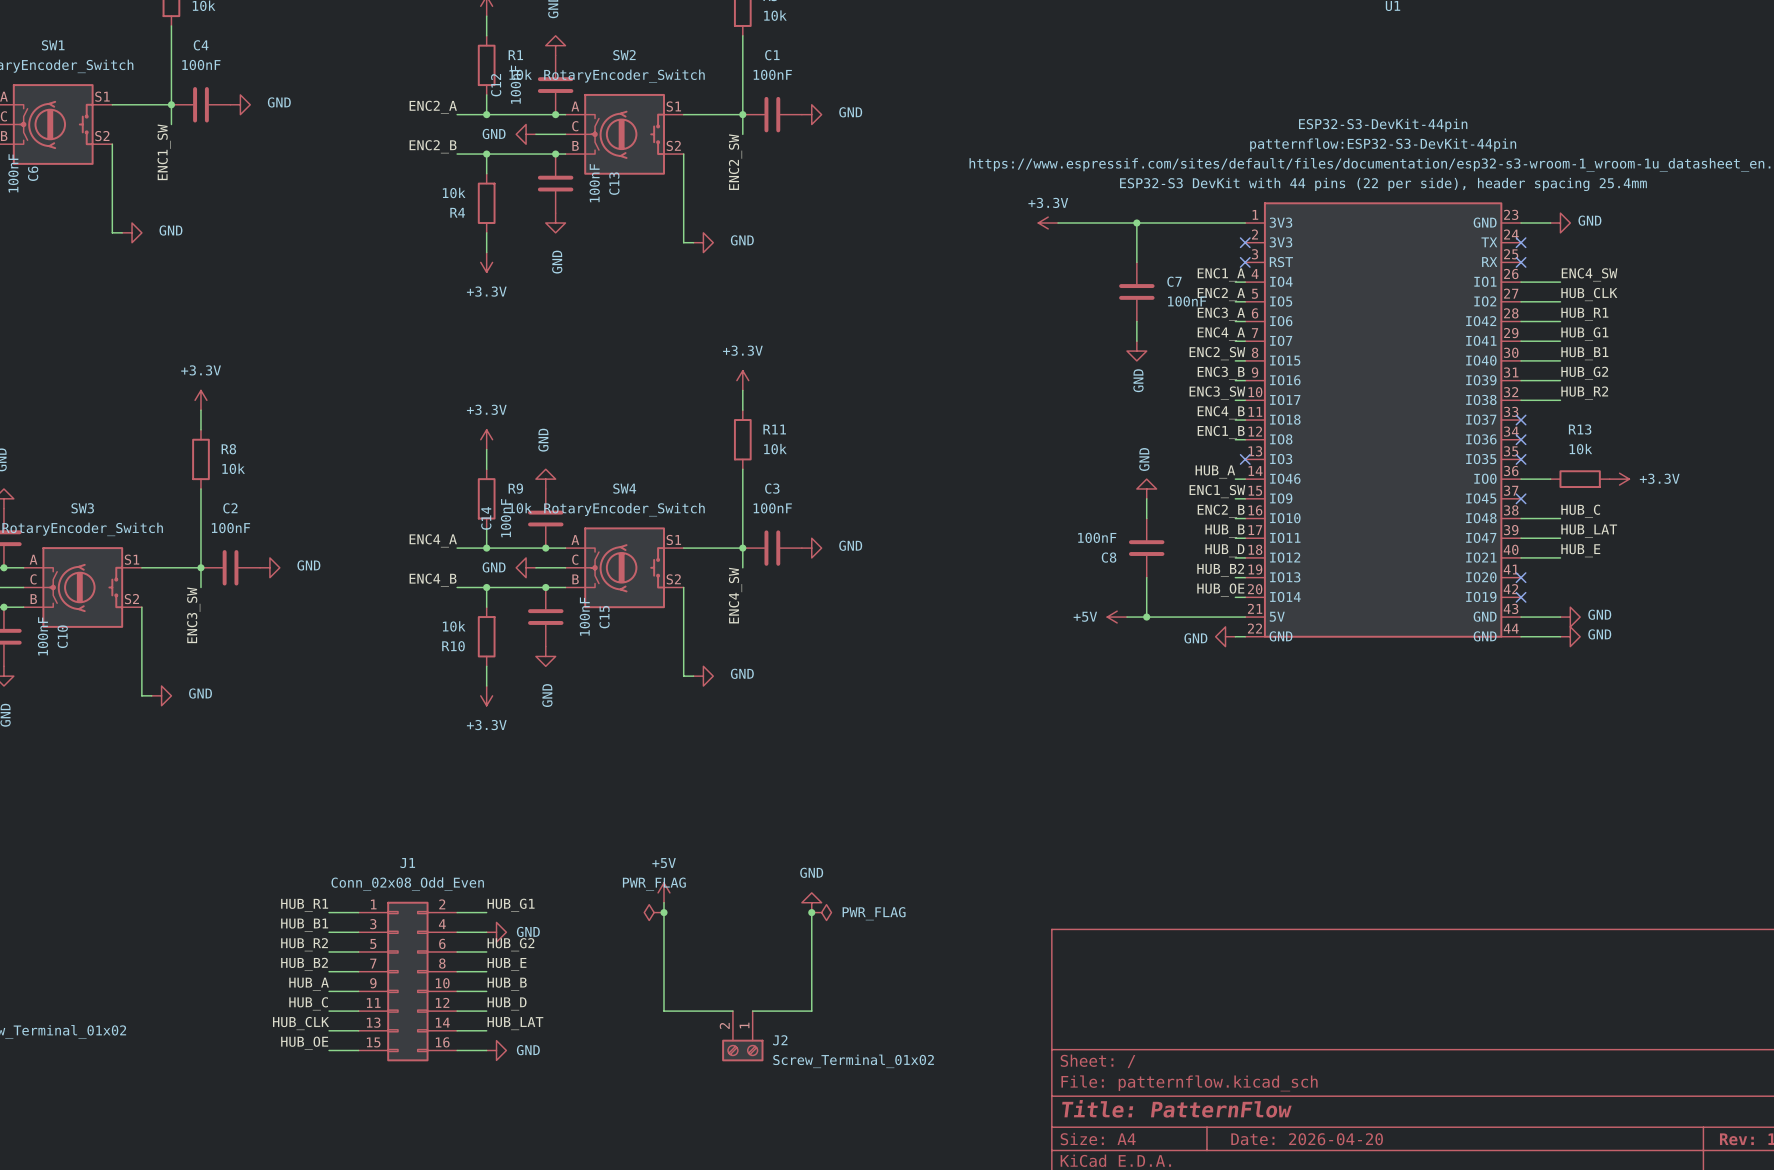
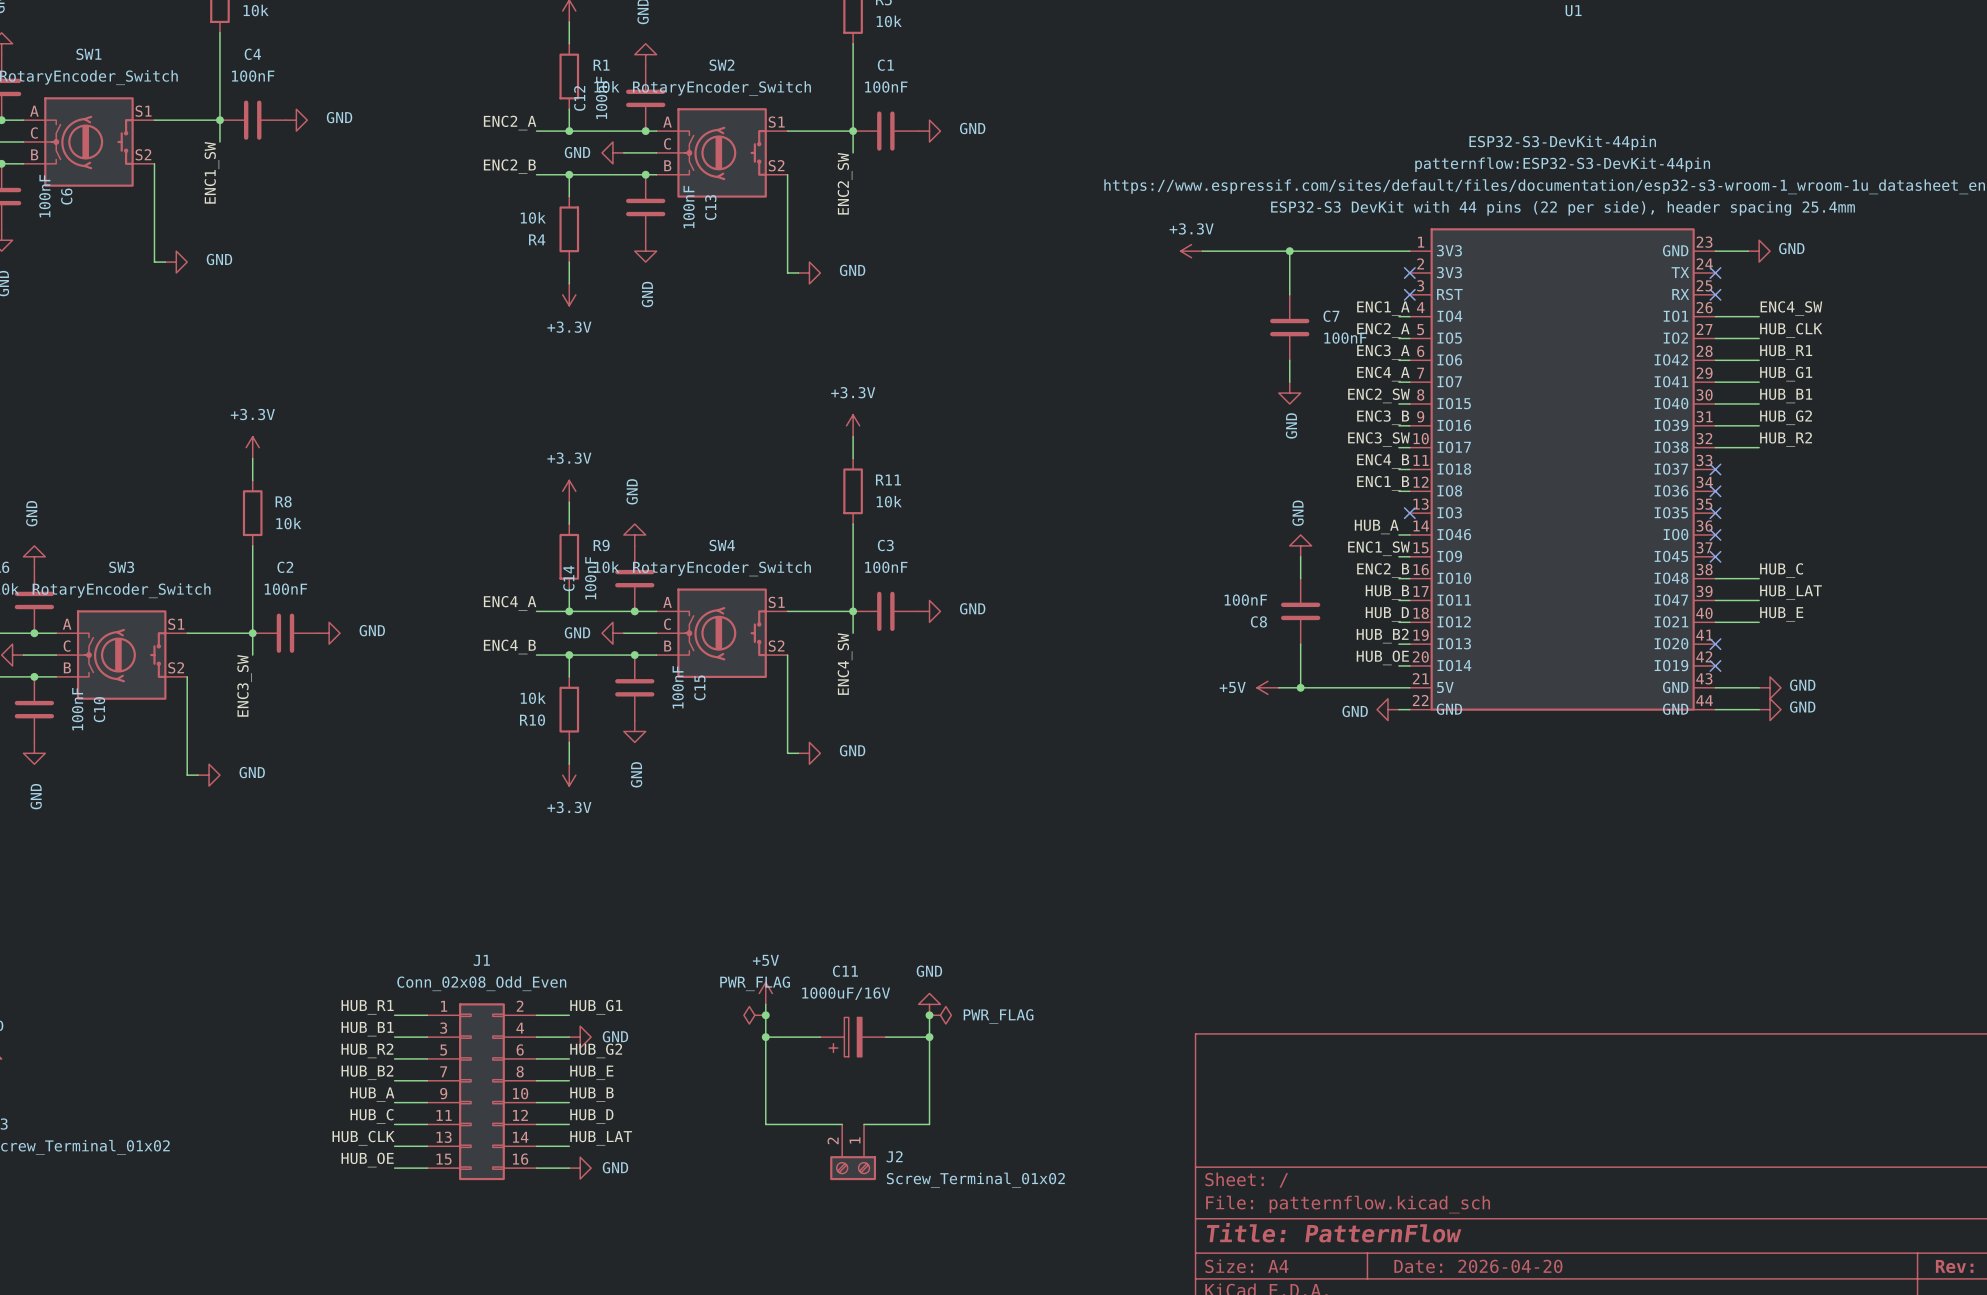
wire: (1521, 479) (1550, 479) -> none
no-connect mark: none -> (1715, 534)
R13: 10k (1580, 479) -> none
power symbol: +3.3V (1619, 479) -> none
wire: none -> (765, 1037) (820, 1037)
junction: none -> (765, 1037)
C11: none -> 1000uF/16V (853, 1037)
wire: none -> (885, 1037) (929, 1037)
junction: none -> (929, 1037)

